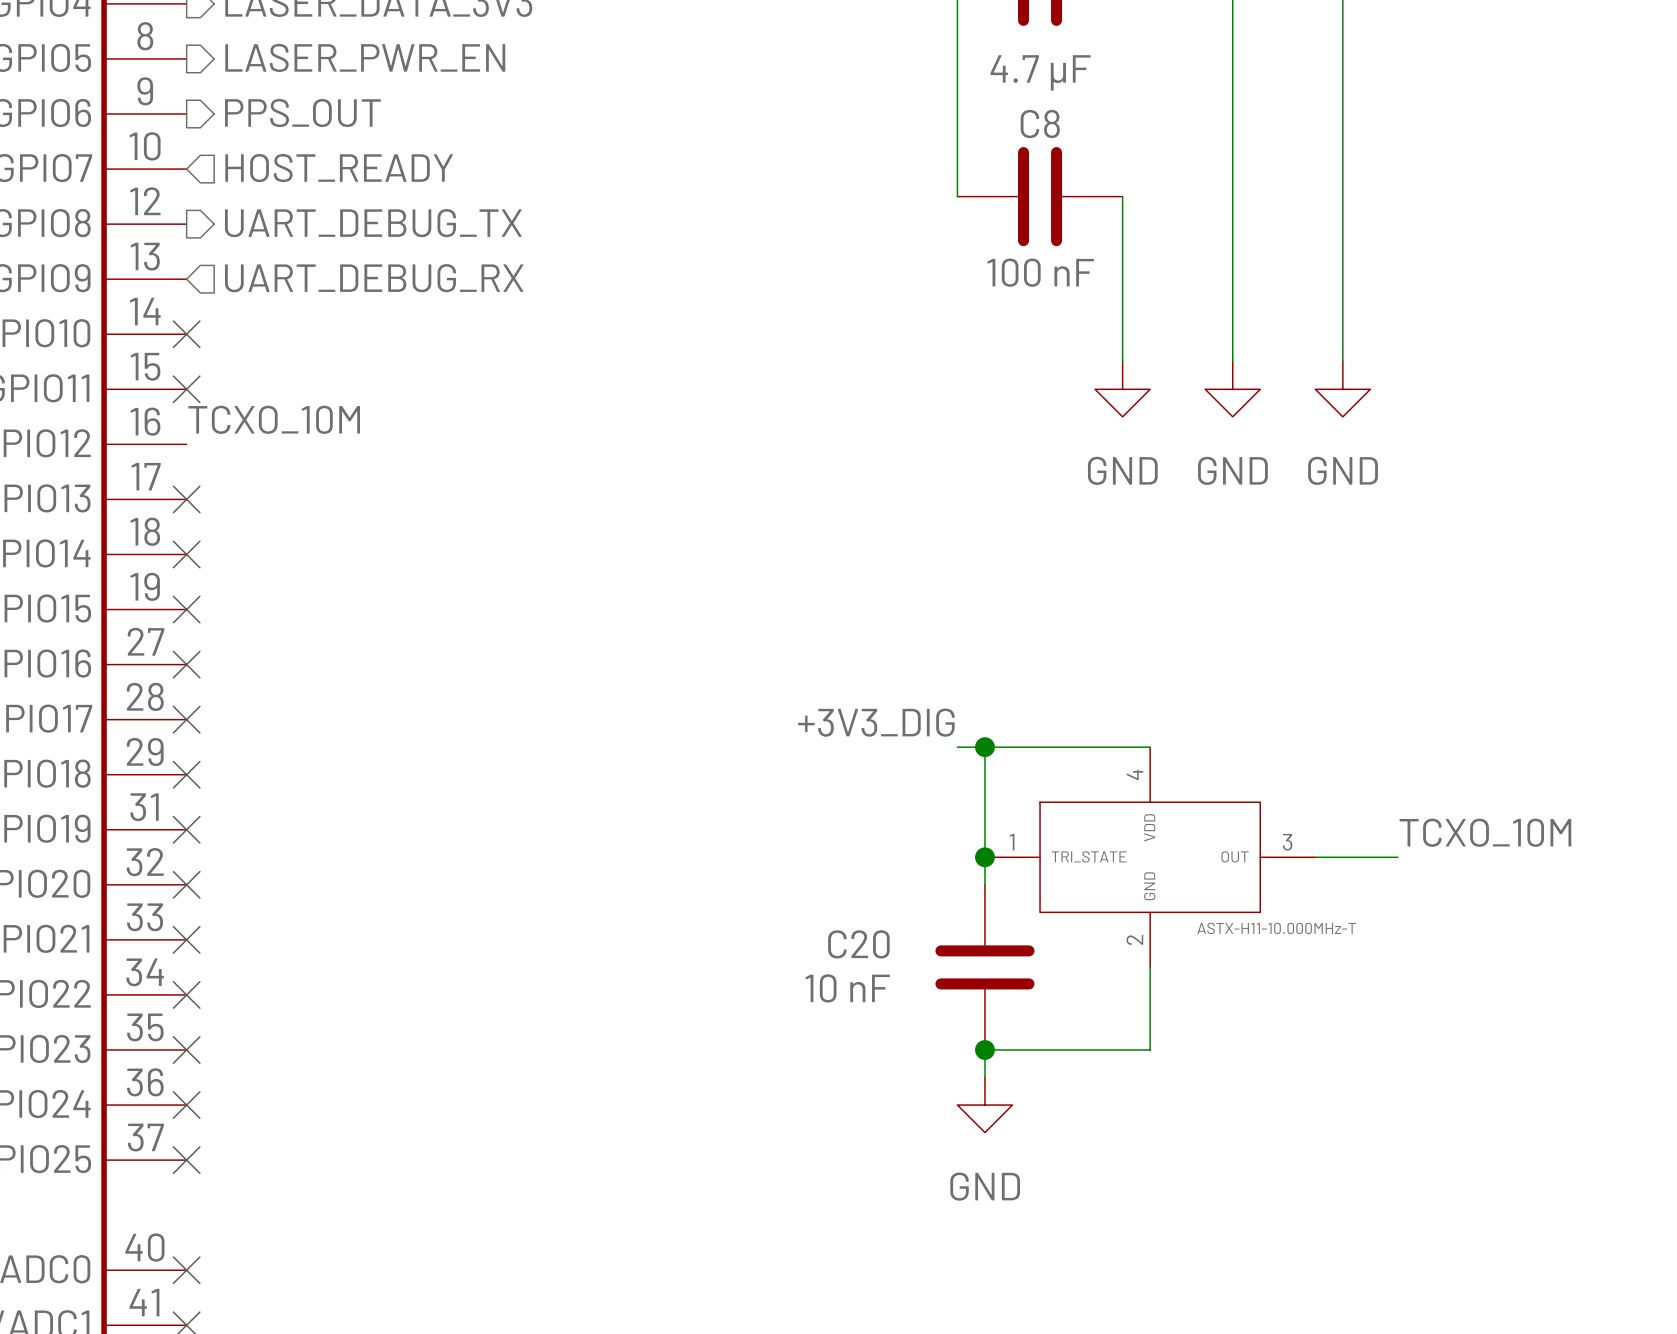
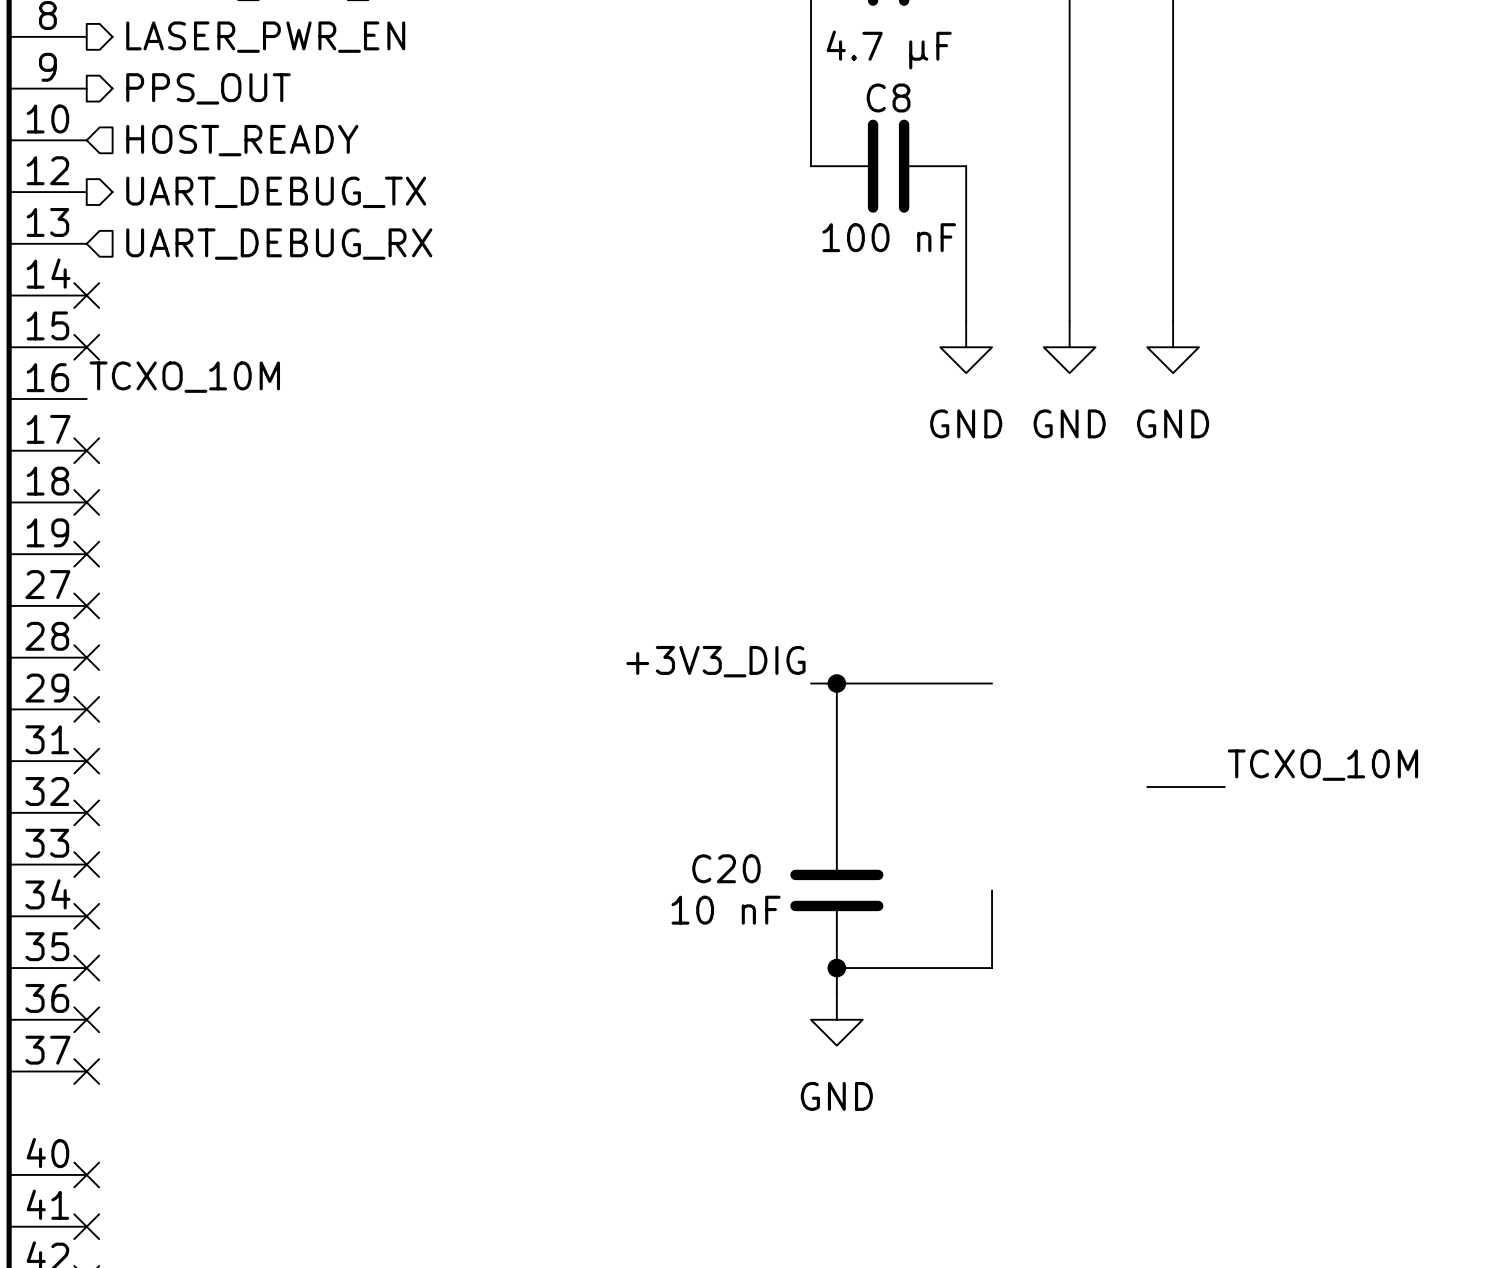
junction: (984, 857) -> none
part: ASTX-H11-10.000MHz-T (1150, 857) -> none

